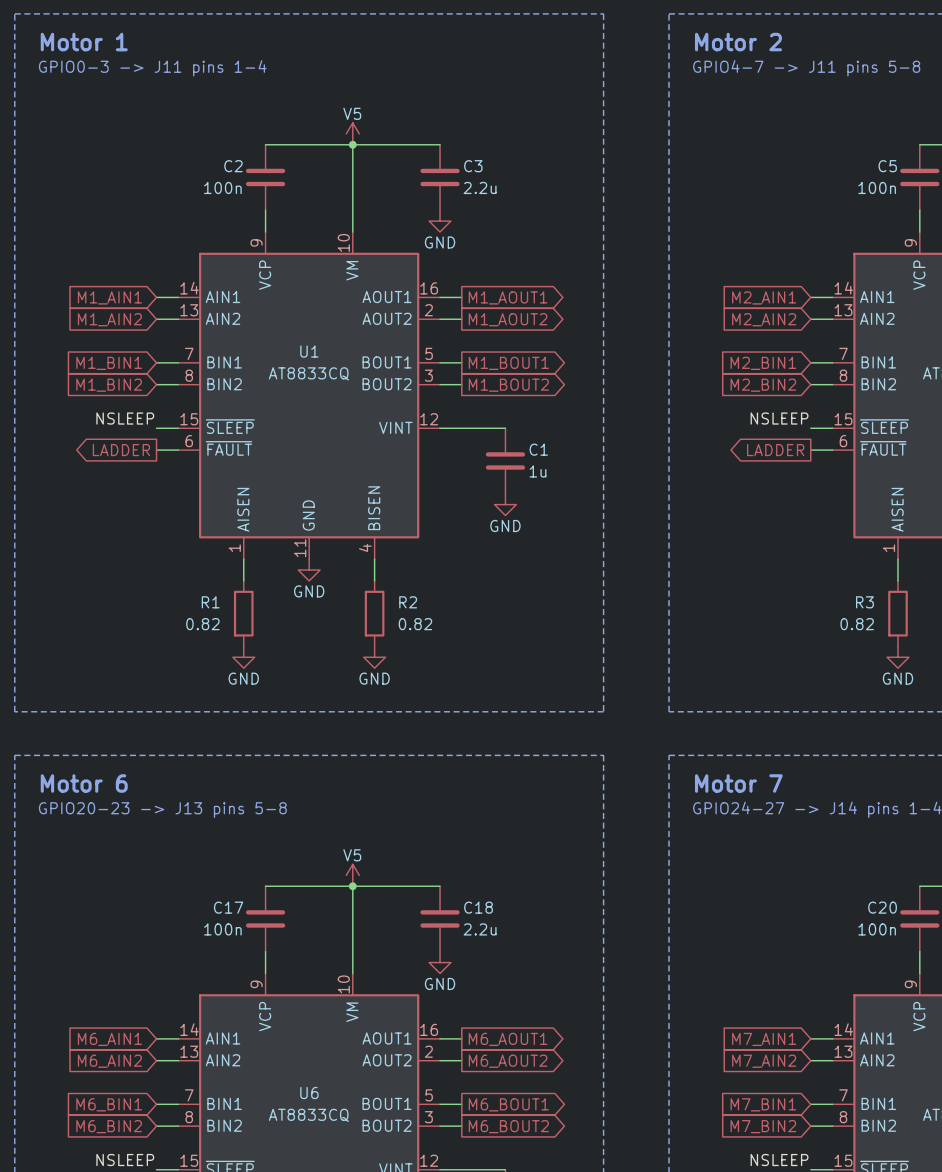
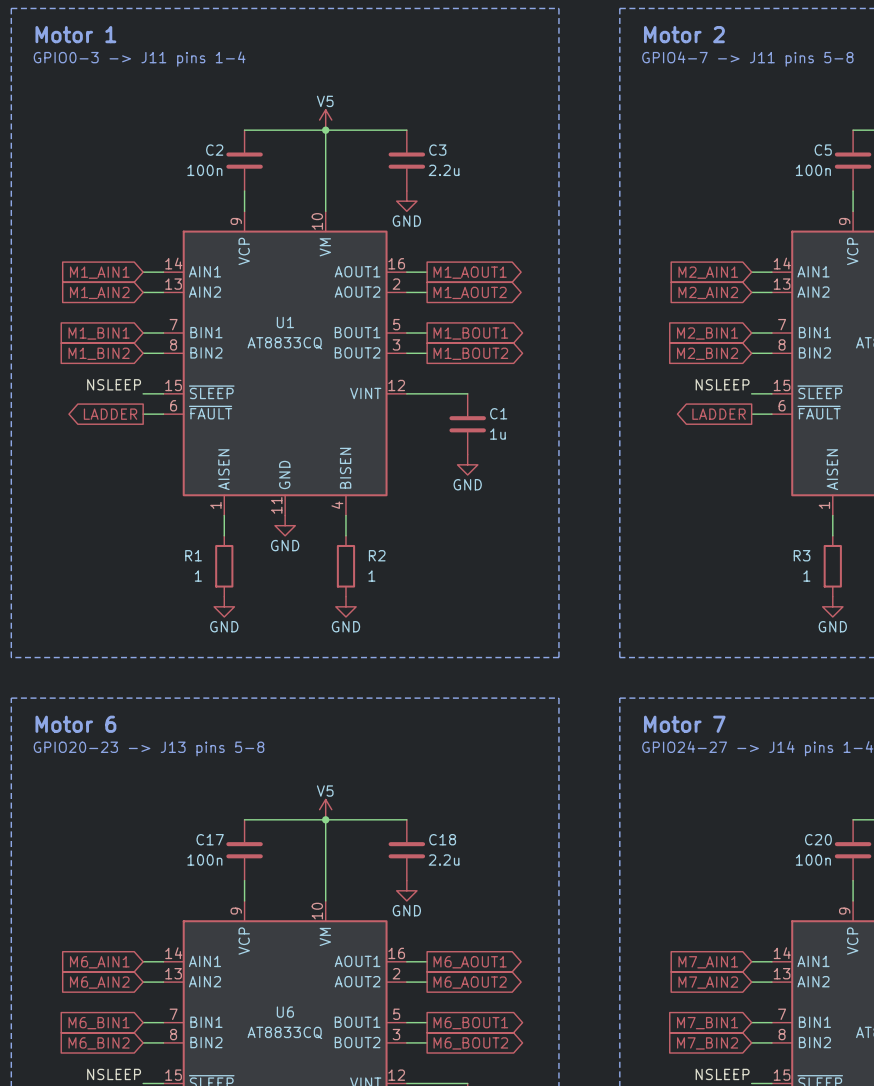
R1 value: 0.82 (202, 624) -> 1 (198, 576)
R2 value: 0.82 (415, 624) -> 1 (371, 576)
R3 value: 0.82 (857, 624) -> 1 (806, 576)

